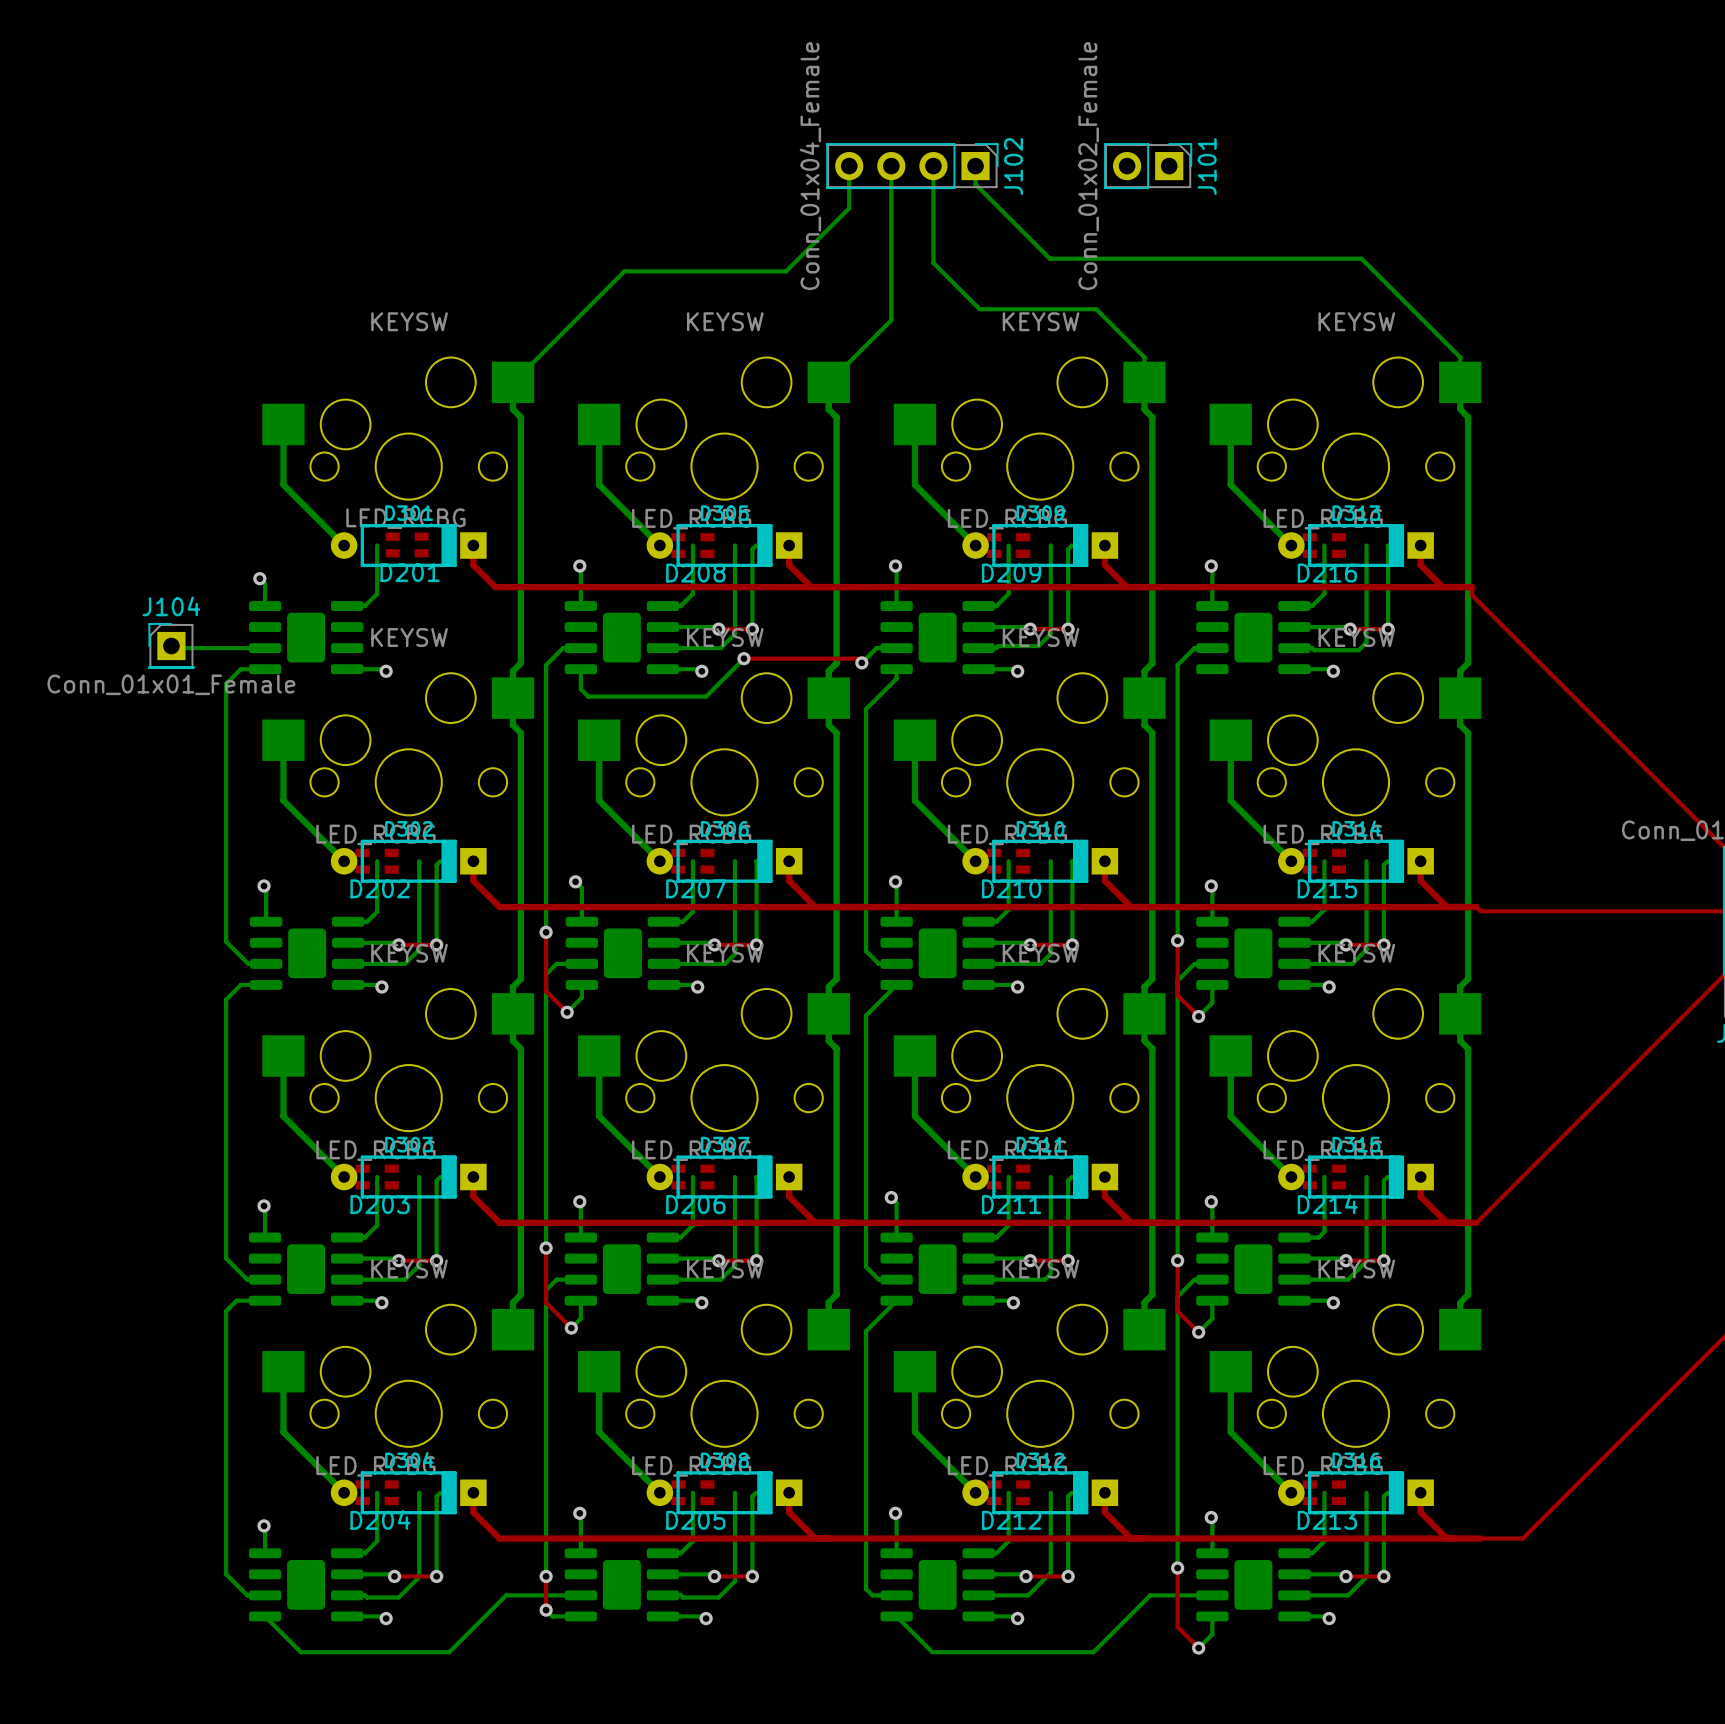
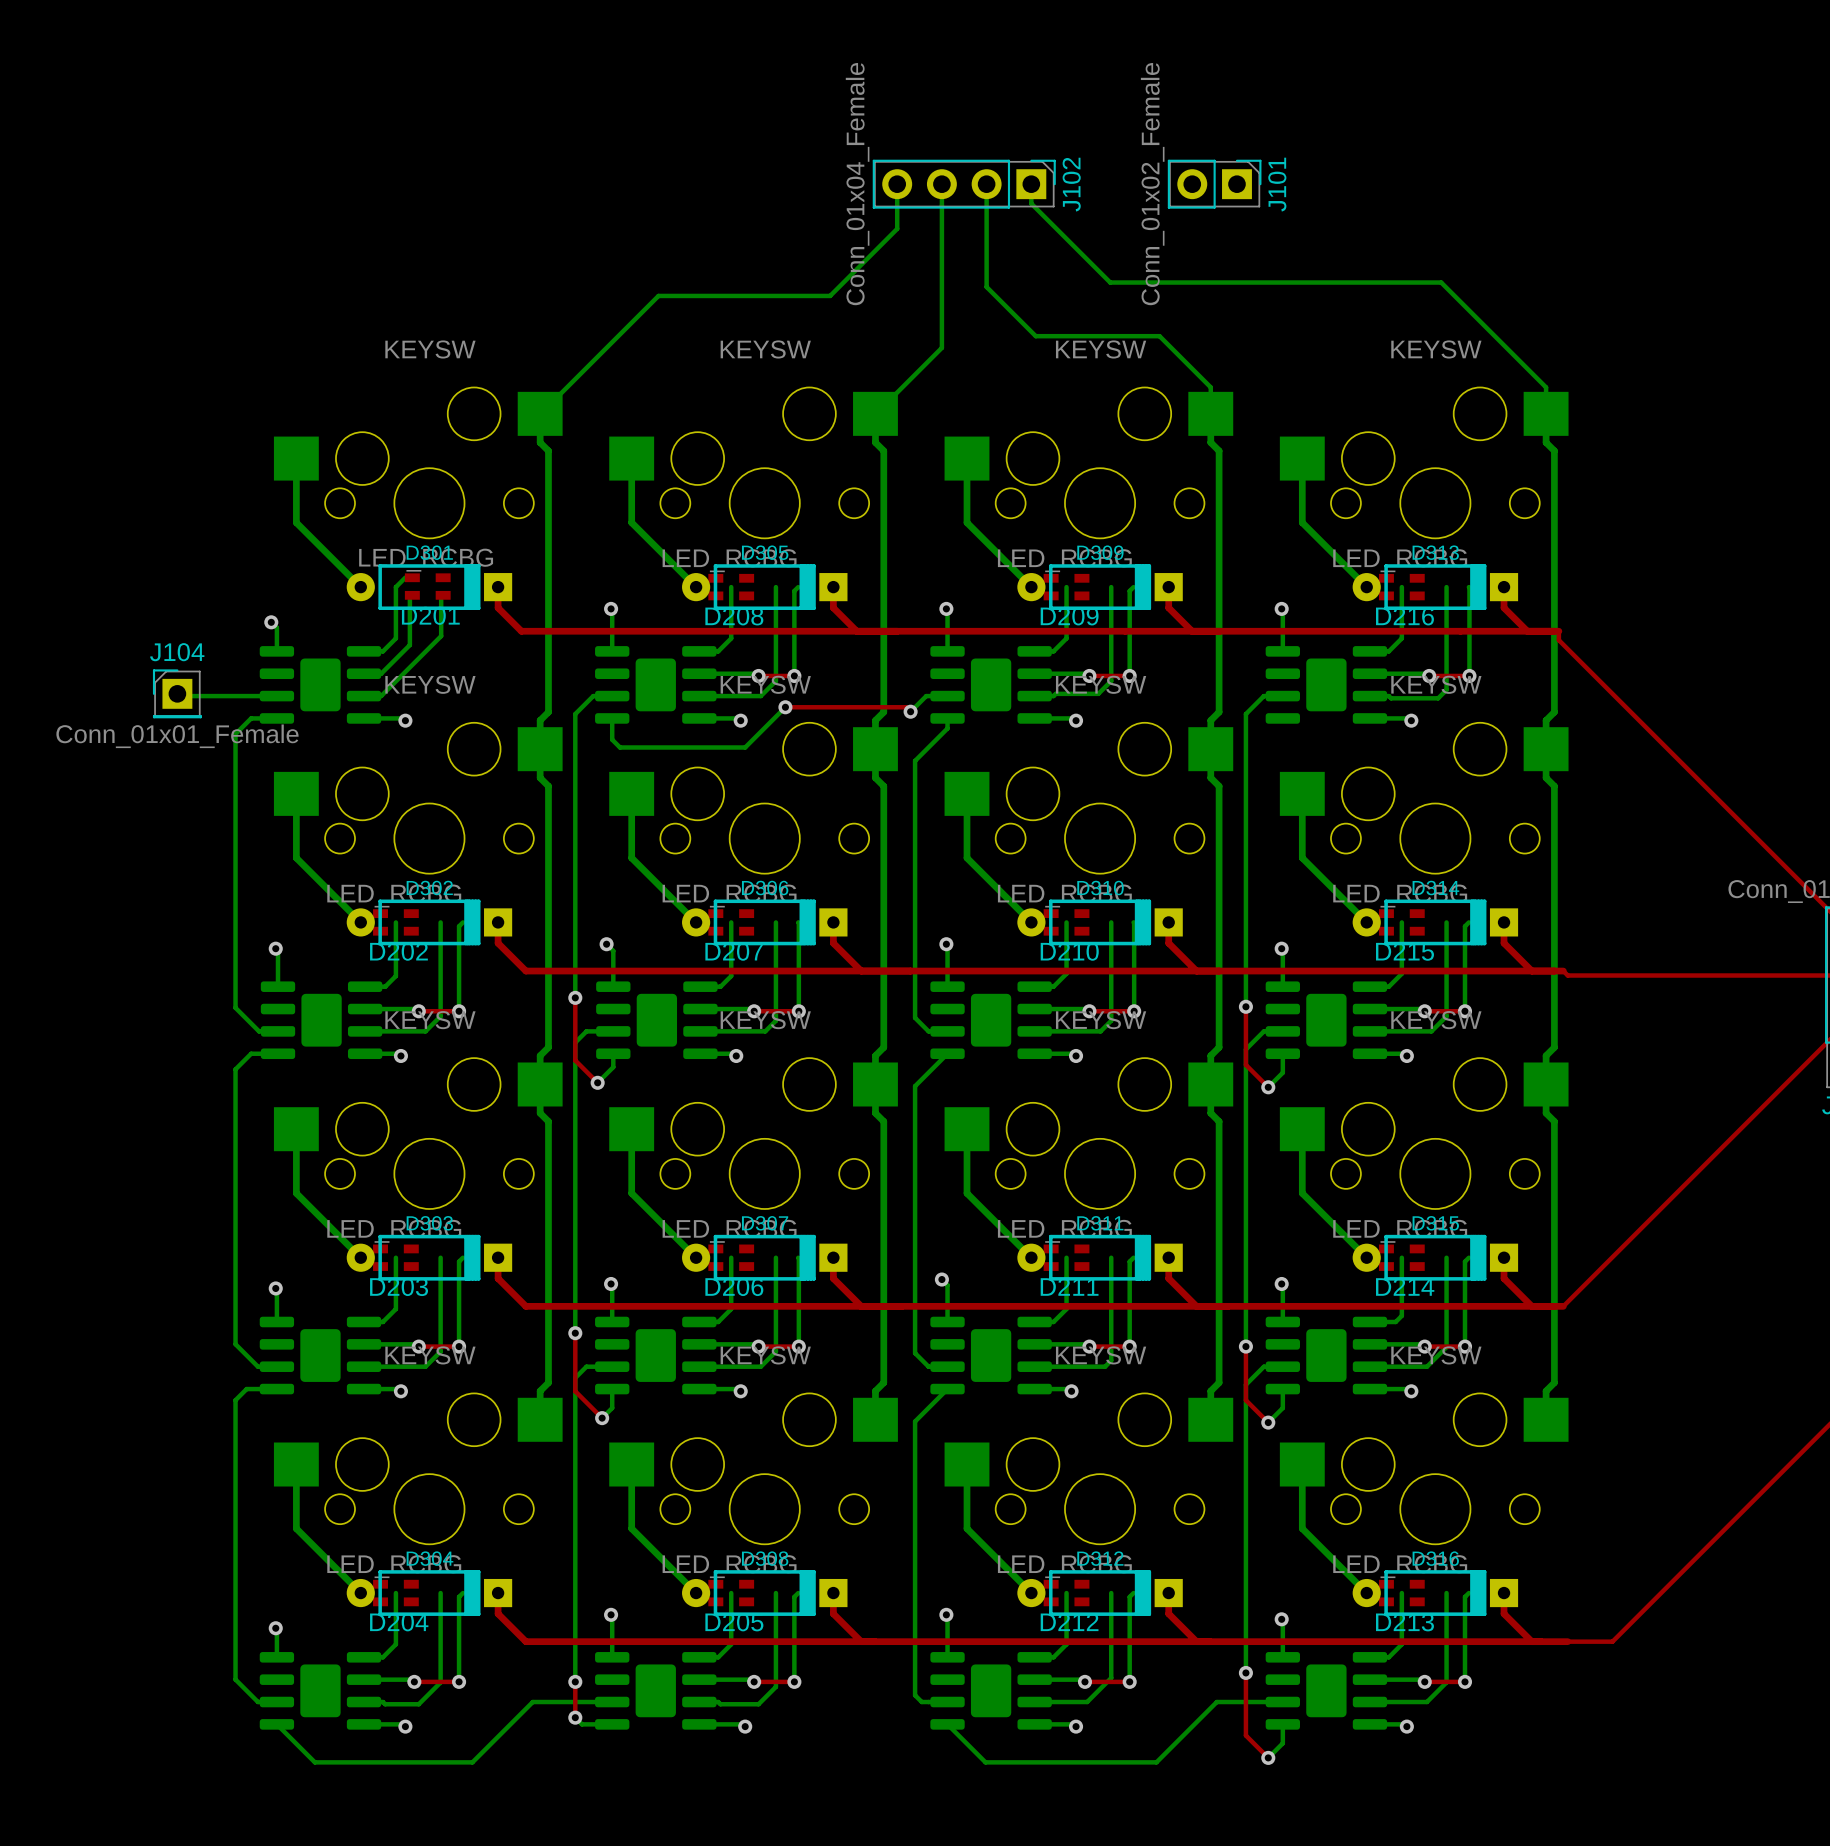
bottom track: none -> (405, 577) (395, 587)
bottom track: none -> (409, 599) (409, 645) (381, 673) (364, 673)
bottom track: none -> (441, 599) (441, 636) (381, 696) (364, 696)

